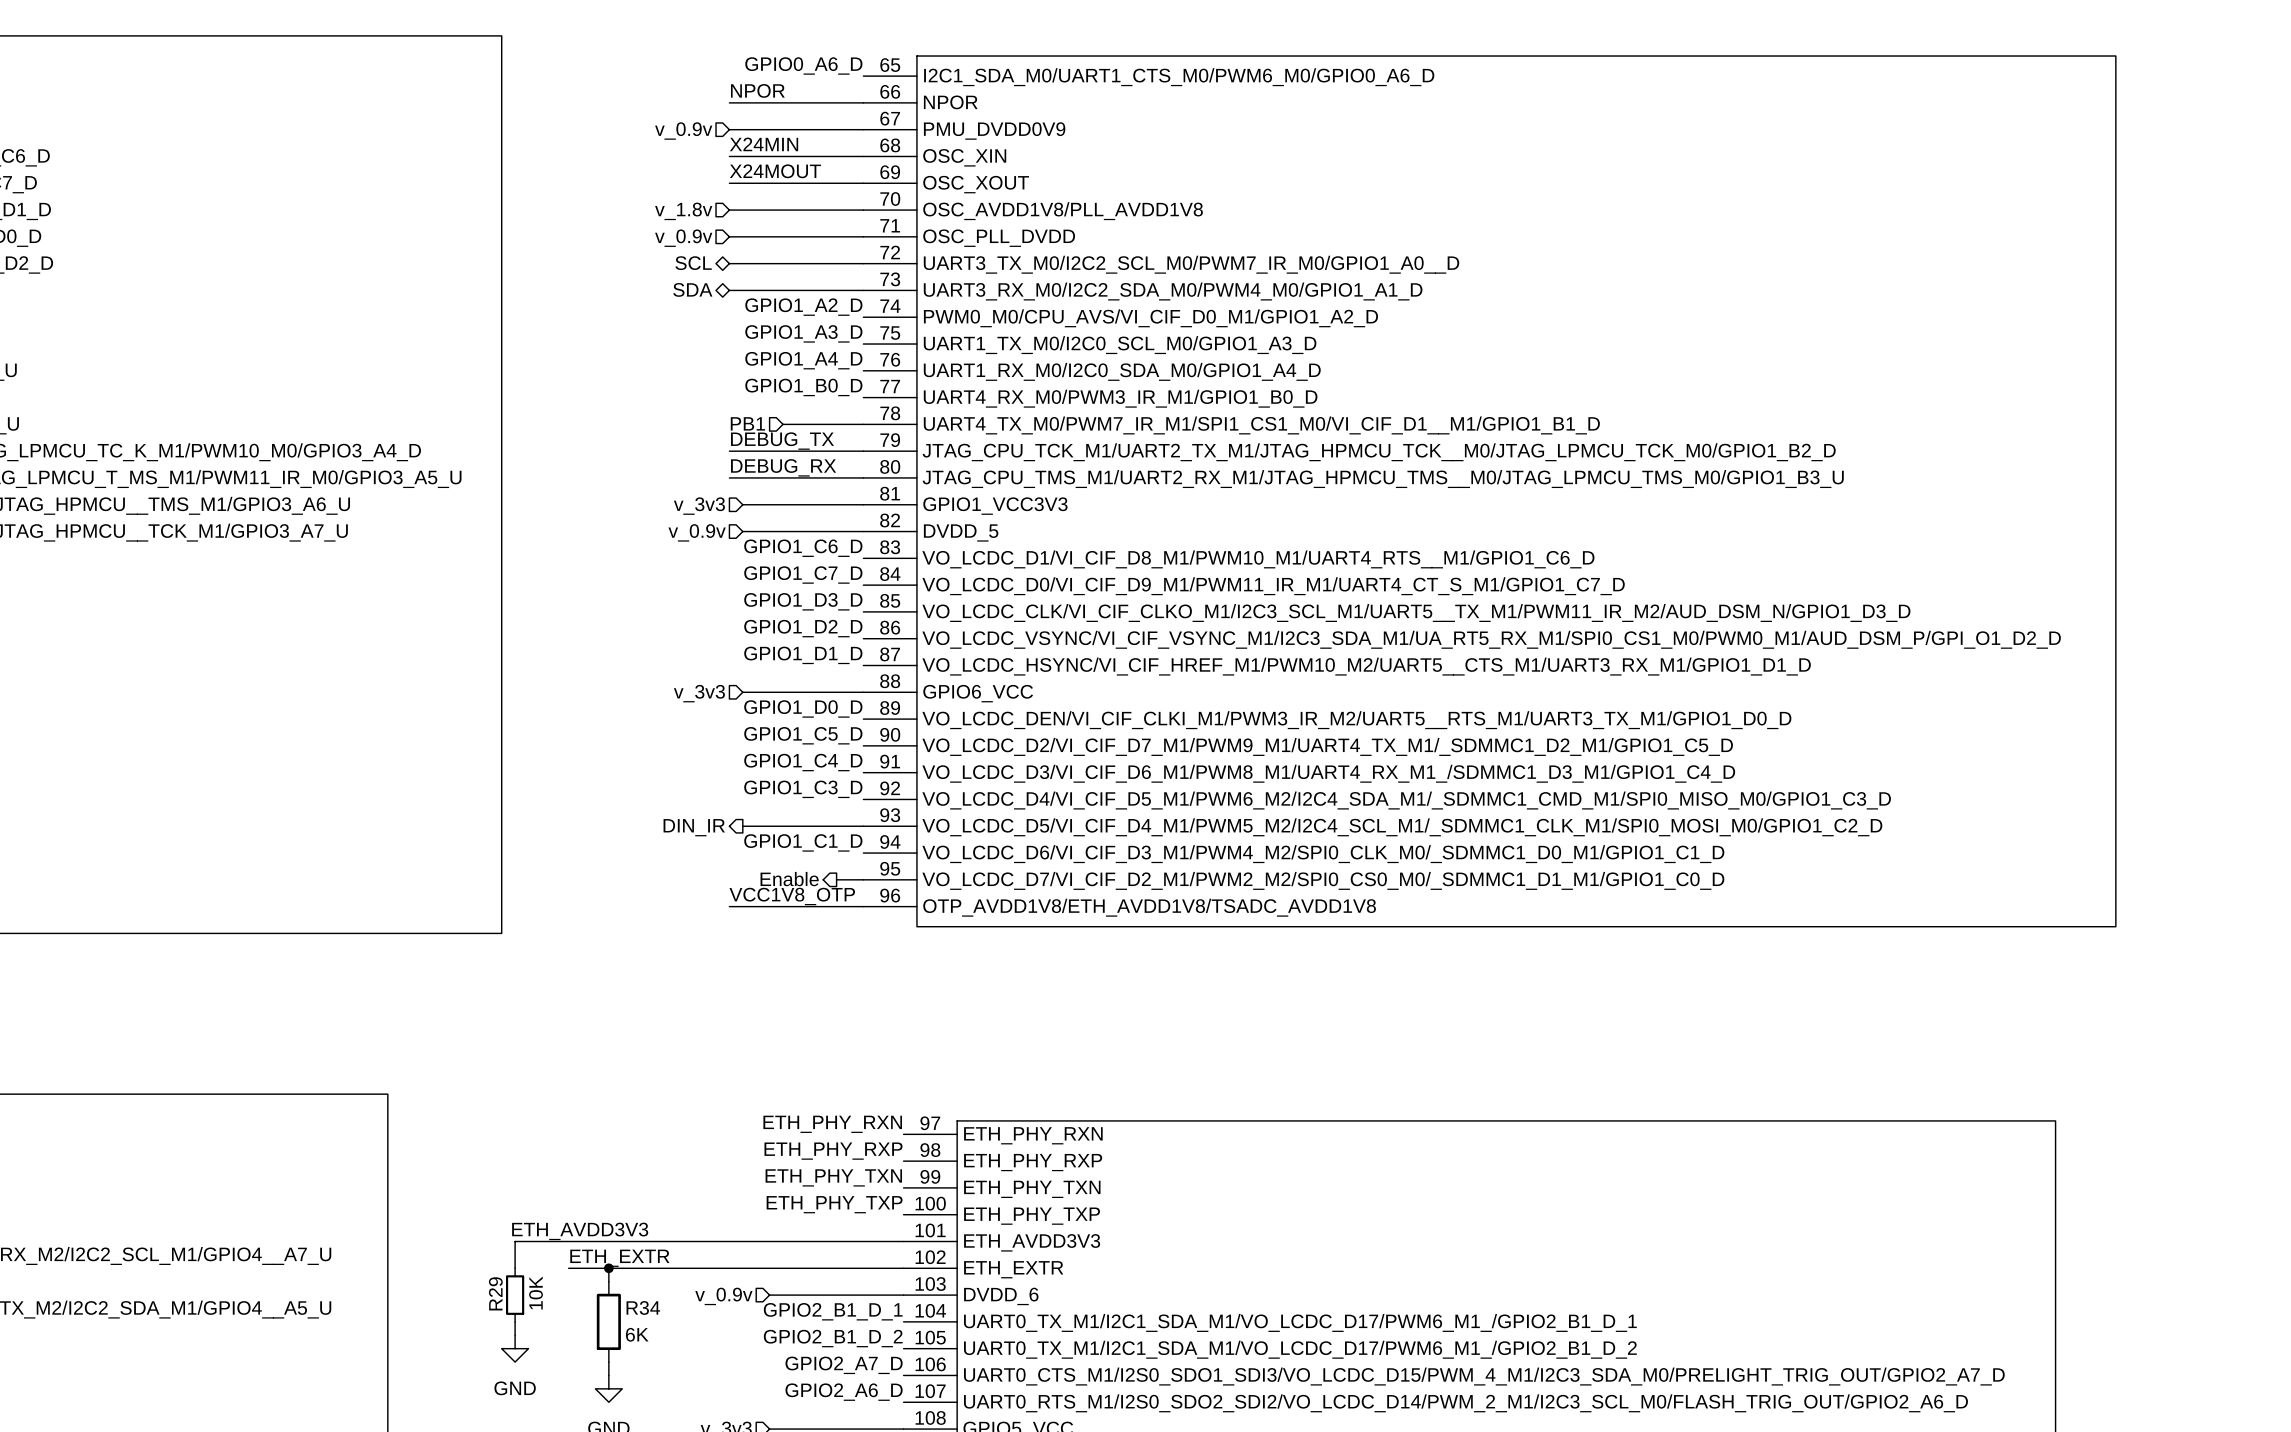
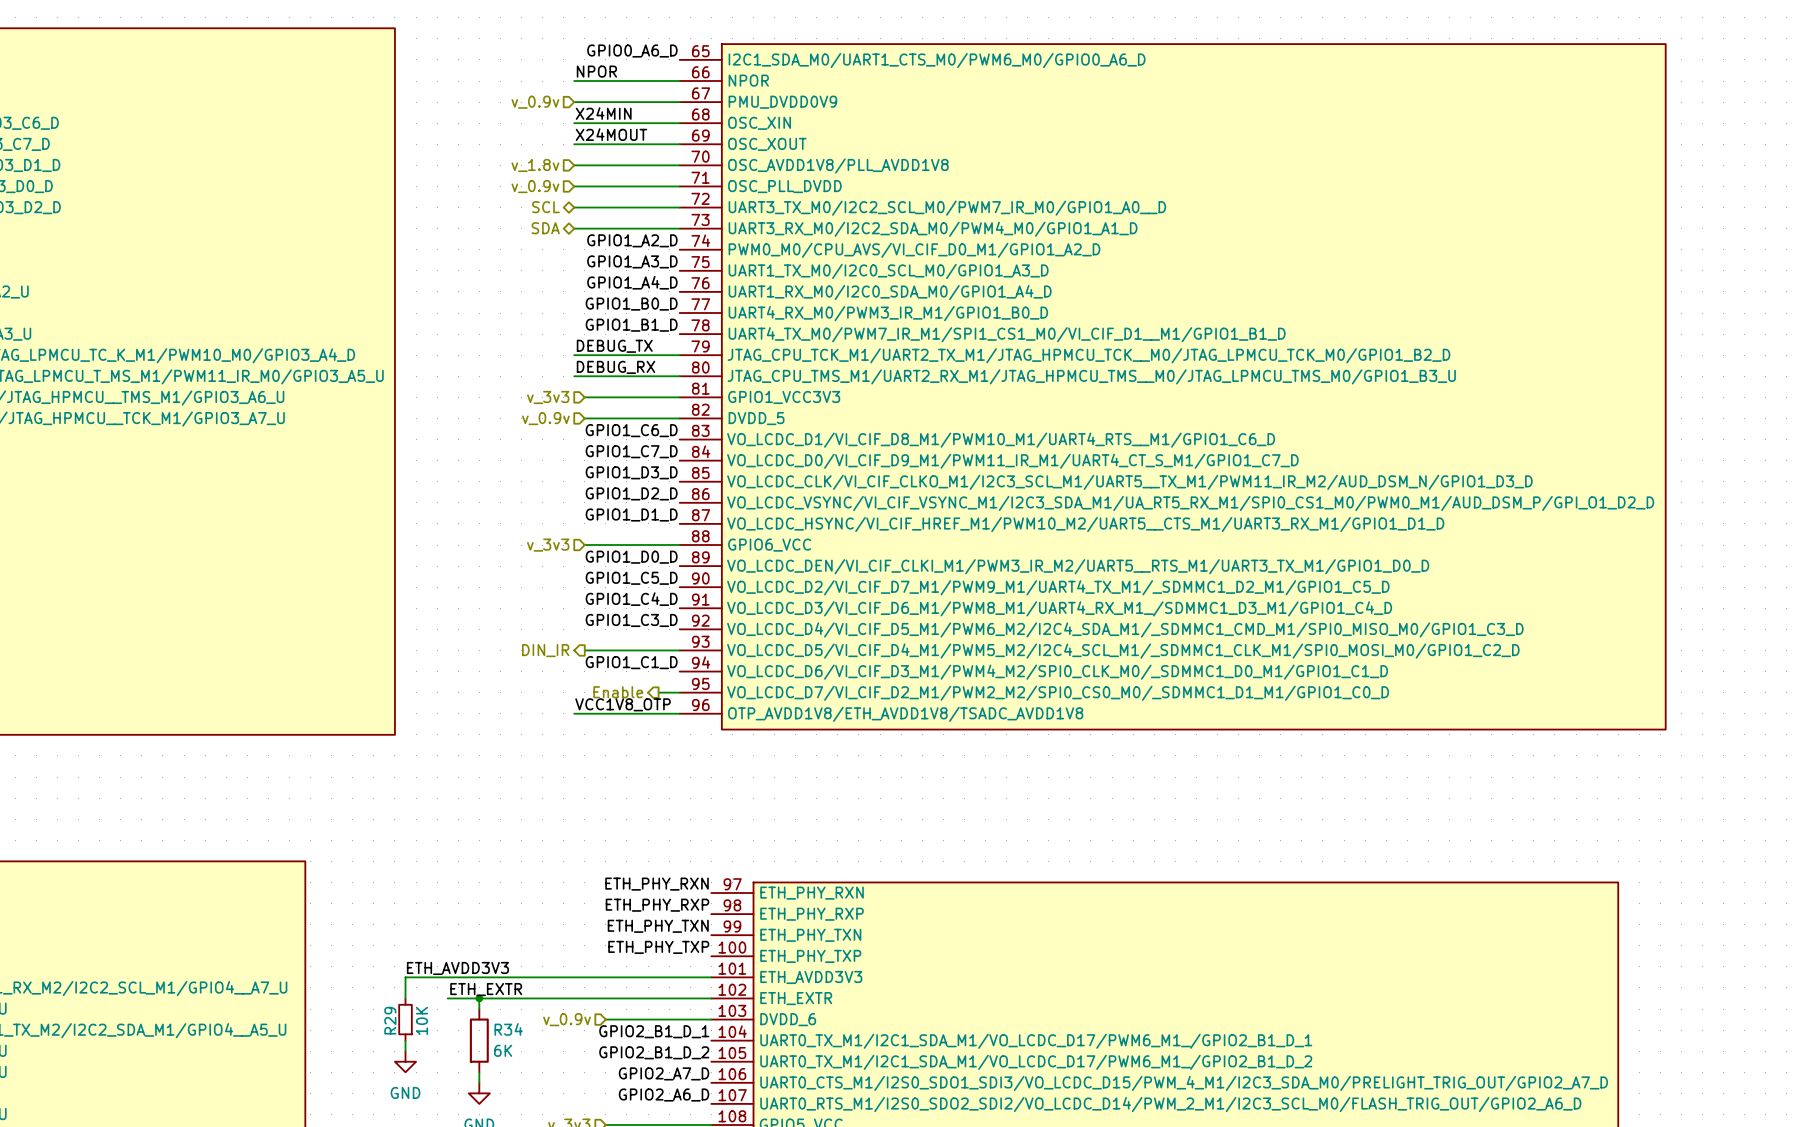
label: none -> GPIO1_B1_D (631, 325)
hierarchical label: PB1 (747, 423) -> none
wire: (783, 424) (863, 424) -> none

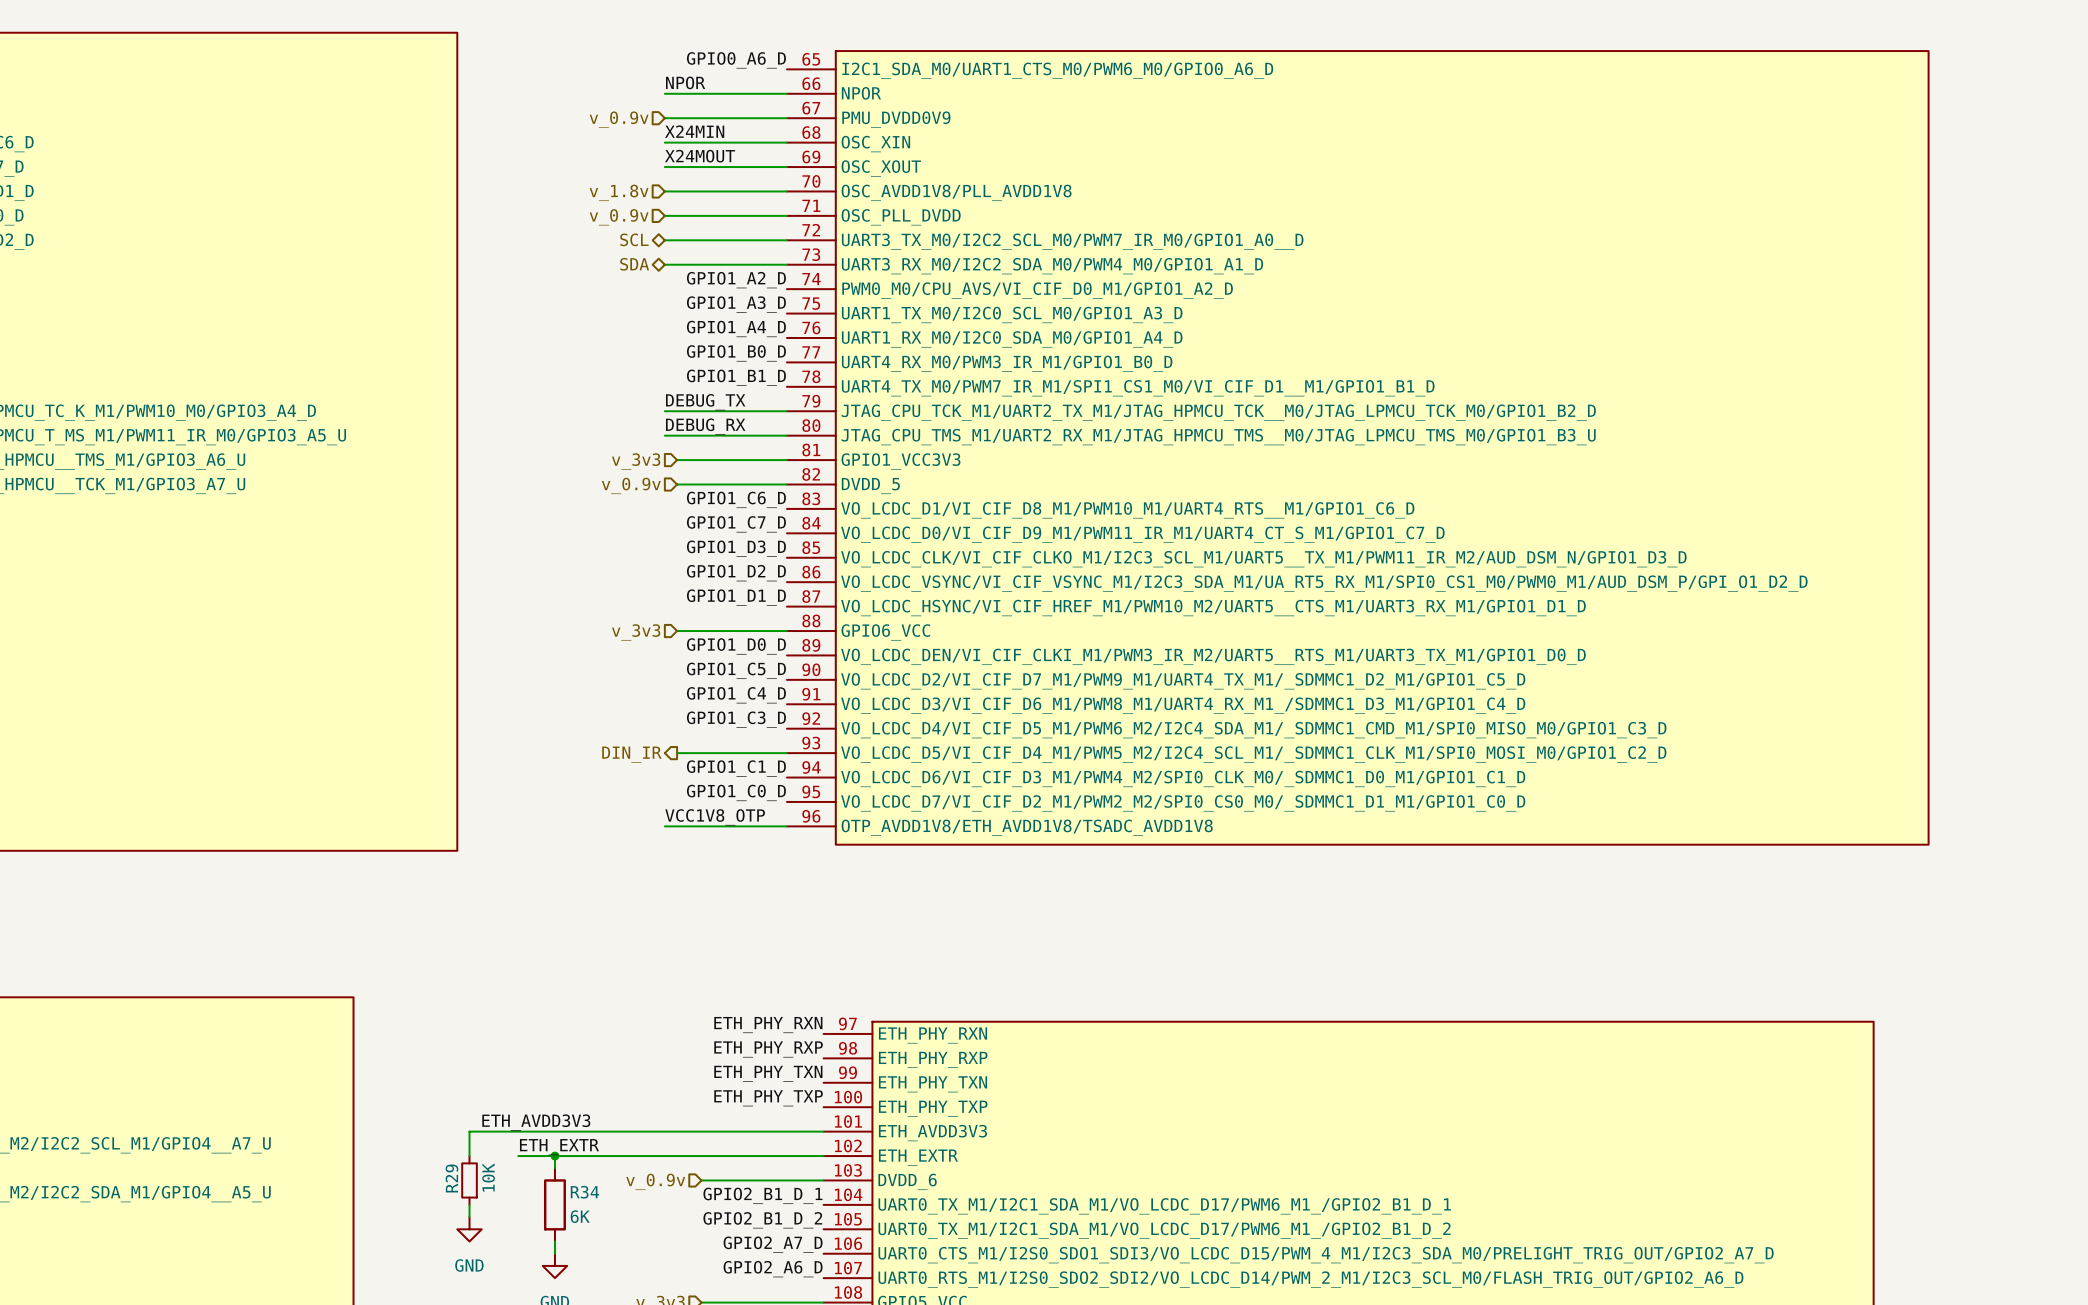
label: none -> GPIO1_C0_D (736, 792)
hierarchical label: Enable (618, 692) -> none
wire: (658, 692) (679, 692) -> none

